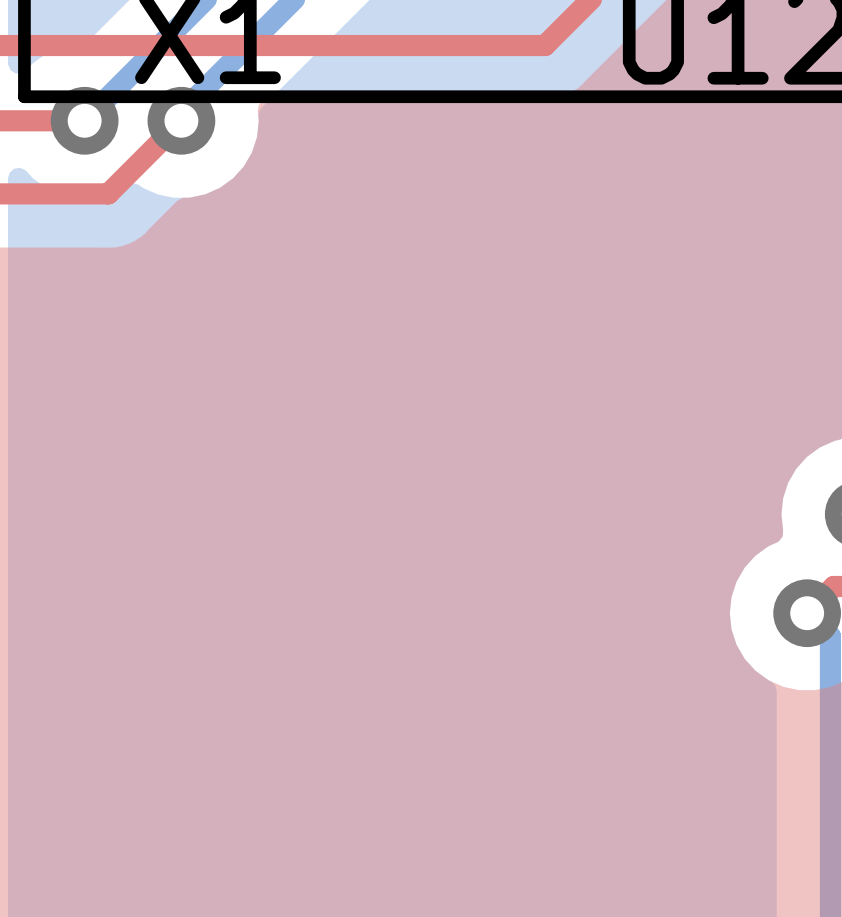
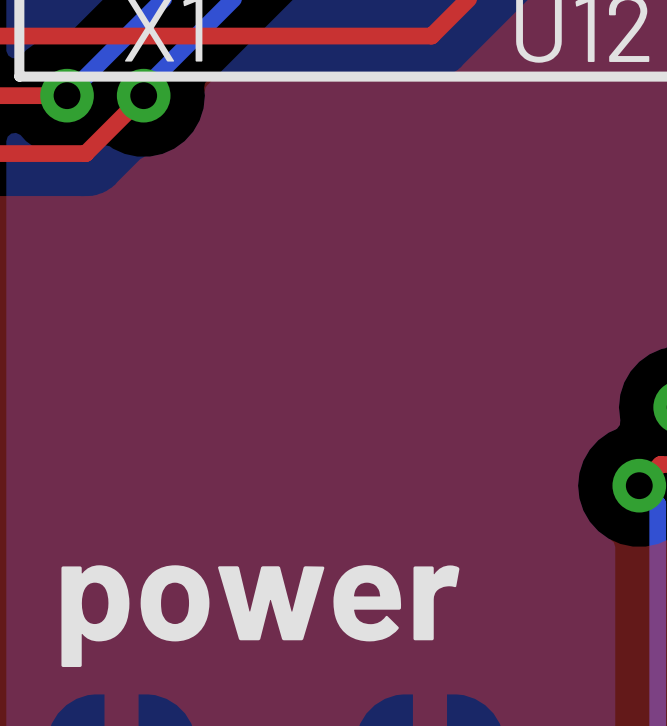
text: none -> power (260, 616)

